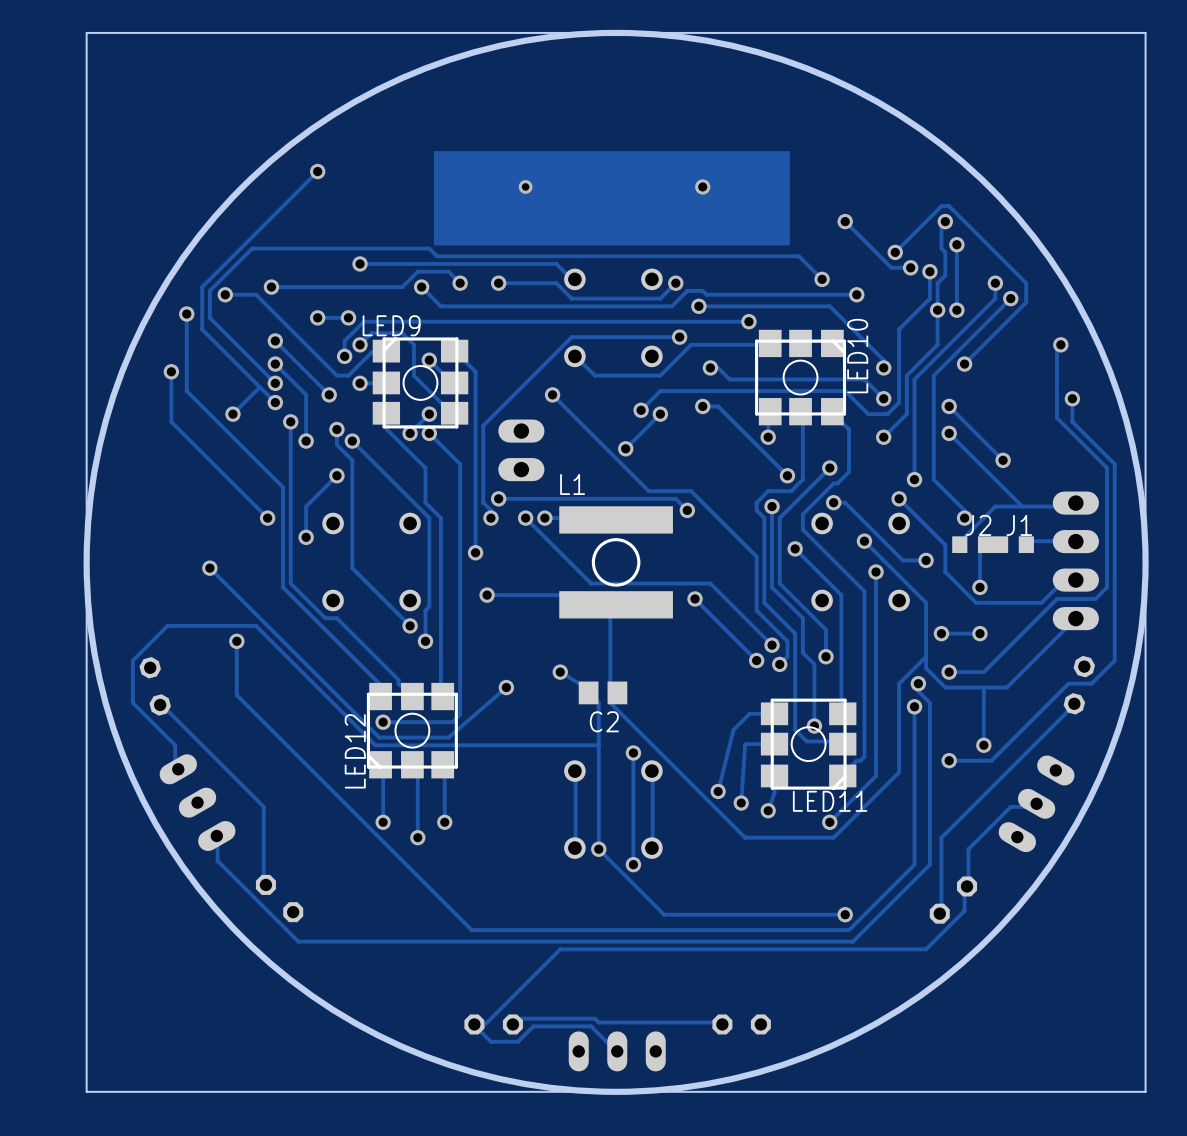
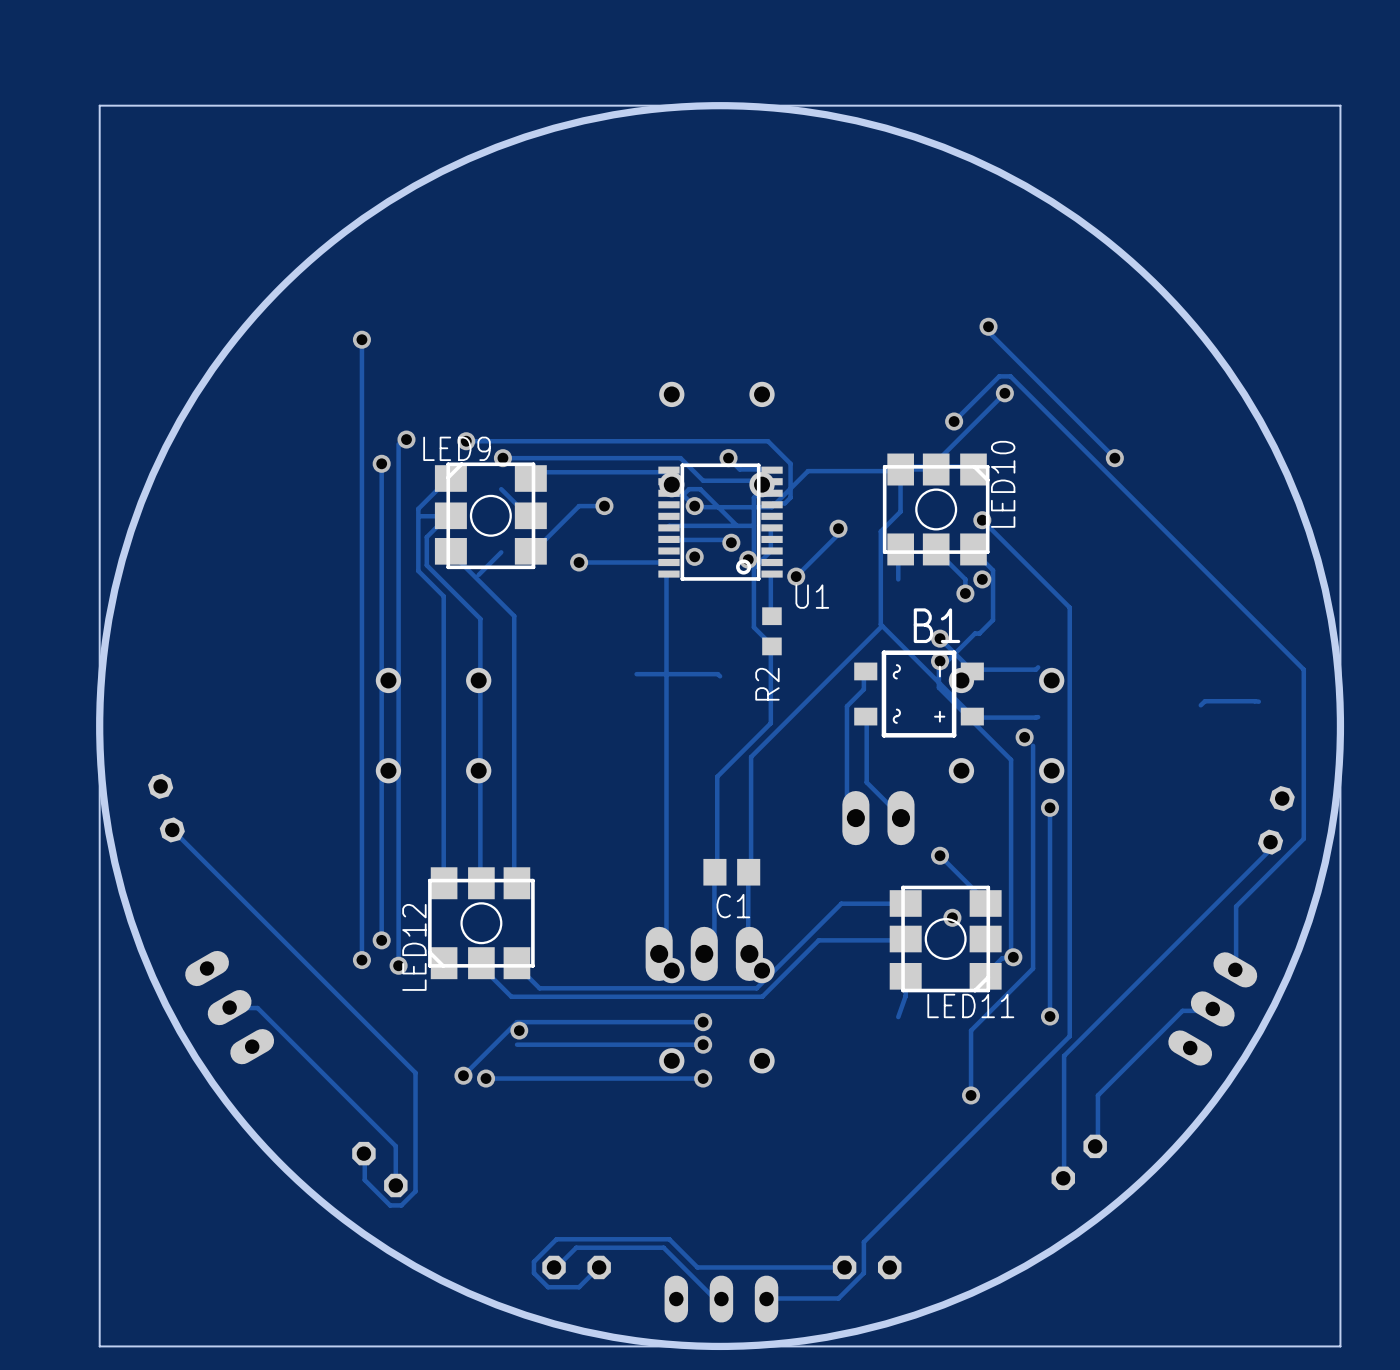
drawing: [433, 151, 790, 246] -> none
track: (317, 171) (202, 287) (202, 329) (275, 402) -> none
via: (317, 171) -> none
via: (525, 186) -> none
via: (702, 186) -> none
track: (845, 221) (891, 267) (910, 267) -> none
track: (945, 221) (941, 225) (941, 248) (945, 252) (945, 275) (937, 283) (937, 344) (906, 375) (906, 414) (883, 437) -> none
via: (945, 221) -> none
track: none -> (987, 331) (1114, 458)
track: none -> (361, 339) (361, 960)
via: none -> (361, 339)
track: (956, 244) (956, 310) -> none
via: (956, 244) -> none
track: (895, 252) (941, 206) (949, 206) (1026, 283) (1026, 302) (964, 364) -> none
via: (895, 252) -> none
track: (360, 263) (556, 263) (571, 279) (574, 279) -> none
via: (360, 263) -> none
via: (910, 267) -> none
track: (929, 271) (929, 298) (899, 329) (899, 402) (887, 414) (868, 414) (845, 391) (660, 391) (641, 410) -> none
via: (929, 271) -> none
track: none -> (1004, 393) (928, 469) (936, 469) (900, 469) (900, 511) (880, 531) (880, 624) (973, 717) (1038, 717)
track: (822, 279) (799, 256) (437, 256) (429, 248) (252, 248) (209, 290) (209, 317) (275, 383) -> none
via: (822, 279) -> none
track: (460, 283) (448, 271) (417, 271) (402, 287) (271, 287) -> none
via: (460, 283) -> none
via: (498, 283) -> none
track: (675, 283) (660, 298) (571, 298) (556, 283) (498, 283) -> none
via: (675, 283) -> none
track: (995, 283) (995, 298) (914, 379) (914, 461) -> (982, 520) (1069, 607)
via: (995, 283) -> none
via: (271, 287) -> none
track: (421, 287) (440, 306) (671, 306) (687, 290) (702, 290) (706, 294) (856, 294) -> none
via: (421, 287) -> none
track: (225, 294) (256, 294) (336, 375) (348, 375) (371, 352) (386, 351) -> none
via: (225, 294) -> none
via position: (856, 294) -> (1004, 393)
track: (1010, 298) (933, 375) (933, 479) (964, 510) (964, 518) -> none
via: (1010, 298) -> none
track: none -> (954, 421) (999, 376) (1010, 376) (1303, 669) (1303, 838) (1236, 906) (1235, 969)
via: none -> (954, 421)
track: (698, 306) (829, 306) (883, 360) (883, 367) -> none
via: (698, 306) -> none
via: (937, 310) -> none
via: (956, 310) -> none
track: (186, 314) (186, 391) (283, 487) (283, 587) (379, 683) (380, 696) -> (450, 478) (418, 508) (418, 570) (443, 596) (444, 883)
via: (186, 314) -> none
via: (317, 317) -> none
track: (348, 317) (317, 317) -> none
track: none -> (466, 441) (768, 441) (790, 463) (790, 497) (784, 503) (772, 504)
via: none -> (466, 441)
track: none -> (398, 444) (398, 965)
track: (748, 321) (363, 321) (344, 340) (344, 356) -> none
via: (748, 321) -> none
track: none -> (502, 458) (680, 458) (703, 480) (772, 481)
via: none -> (502, 458)
track: none -> (728, 458) (739, 469) (772, 470)
via: none -> (728, 458)
via: none -> (1114, 458)
track: (679, 337) (571, 337) (483, 425) (483, 502) (490, 510) (490, 518) -> none
via: (679, 337) -> none
track: none -> (381, 463) (381, 940)
via: none -> (381, 463)
track: (275, 340) (329, 394) -> none
via: (275, 340) -> none
track: (360, 344) (371, 333) (402, 333) (413, 344) (413, 375) (452, 414) (454, 413) -> (604, 506) (579, 506) (531, 554) (530, 551)
via: (360, 344) -> none
track: (1060, 344) (1056, 348) (1056, 417) (1107, 468) (1107, 587) (1095, 598) (1056, 598) (983, 672) (949, 672) -> none
via: (1060, 344) -> none
track: (454, 351) (475, 371) (475, 552) -> (530, 478) (536, 472) (666, 472) (669, 470)
via: (344, 356) -> none
via: (429, 360) -> none
track: none -> (666, 492) (669, 494) (683, 494) (689, 489) (700, 489) (736, 525)
track: none -> (770, 492) (770, 494) (756, 494) (753, 497) (755, 566)
track: (275, 364) (306, 394) (306, 441) -> none
via: (275, 364) -> none
via: (964, 364) -> none
track: (710, 367) (718, 367) (729, 379) (864, 379) (883, 398) -> none
via: (710, 367) -> none
via: (883, 367) -> none
track: (171, 371) (171, 421) (267, 518) -> none
via: (171, 371) -> none
via: none -> (604, 506)
via: none -> (694, 506)
via: (275, 383) -> none
via: (360, 383) -> none
via: none -> (982, 520)
track: (259, 387) (232, 414) -> none
U1: none -> (720, 522)
track: none -> (753, 525) (669, 525) (669, 527)
track: none -> (772, 527) (772, 550) (753, 568) (753, 627) (771, 646) (770, 723) (717, 776) (717, 869) (714, 872) (714, 943) (704, 953)
track: none -> (838, 528) (838, 534) (796, 576)
via: none -> (838, 528)
via: (329, 394) -> none
track: (552, 394) (648, 491) (691, 491) (756, 556) (756, 610) (787, 641) (787, 656) (779, 664) -> none
via: (552, 394) -> none
via: (883, 398) -> none
track: (1072, 398) (1072, 421) (1114, 464) (1114, 660) (1091, 683) (1068, 683) (991, 760) (949, 760) -> none
via: (1072, 398) -> none
via: (275, 402) -> none
track: none -> (669, 539) (728, 539) (731, 542)
via: none -> (731, 542)
track: (702, 406) (718, 406) (787, 475) -> none
via: (702, 406) -> none
track: (949, 406) (1003, 460) -> none
via: (949, 406) -> none
via: (641, 410) -> none
track: (800, 411) (802, 414) (802, 479) (791, 491) (768, 491) (756, 502) (756, 510) (764, 518) (764, 602) (795, 633) (795, 729) (806, 741) (841, 741) (842, 744) -> (936, 549) (965, 579) (965, 593)
track: (386, 413) (386, 429) (425, 468) (425, 502) (440, 518) (440, 695) (442, 696) -> (450, 551) (514, 616) (514, 881) (516, 883)
via: (232, 414) -> none
via: (429, 414) -> none
track: (660, 414) (625, 448) -> none
via: (660, 414) -> none
via: none -> (694, 556)
via: none -> (748, 559)
track: (290, 421) (290, 583) (325, 618) (336, 618) (398, 679) (398, 683) (412, 696) -> (450, 515) (449, 514) (426, 537) (426, 565) (480, 618) (481, 883)
via: (290, 421) -> none
via: none -> (579, 562)
track: none -> (669, 562) (579, 562)
track: (336, 429) (336, 444) (352, 460) (352, 568) (410, 625) -> none
via: (336, 429) -> none
track: none -> (669, 574) (666, 576) (666, 946) (659, 953)
track: none -> (772, 574) (771, 616)
via: (410, 433) -> none
track: (429, 433) (460, 464) (460, 714) (452, 722) (383, 722) -> none
via: (429, 433) -> none
track: (949, 433) (1022, 506) -> none
via: (949, 433) -> none
via: none -> (796, 576)
via: (768, 437) -> none
via: none -> (982, 579)
via: (883, 437) -> none
via: (306, 441) -> none
track: (352, 441) (429, 518) (429, 606) (425, 610) (425, 641) -> none
via: (352, 441) -> none
via: (625, 448) -> none
via: none -> (965, 593)
part rotation: 0° (521, 450) -> 90° clockwise (878, 818)
part position: (521, 450) -> (878, 818)
via: (1003, 460) -> none
track: (829, 468) (779, 518) (779, 583) (825, 629) (825, 656) -> none
via: (829, 468) -> none
track: (336, 475) (306, 506) (306, 537) -> none
via: (336, 475) -> none
via: (787, 475) -> none
track: none -> (882, 625) (751, 757) (751, 869) (748, 872) (749, 953)
track: none -> (1069, 629) (1069, 895)
via: (914, 479) -> none
R2: none -> (771, 631)
track: none -> (940, 638) (972, 671) (973, 669) (1035, 669) (1038, 667)
via: none -> (940, 638)
track: (498, 498) (675, 498) (687, 510) -> none
via: (498, 498) -> none
track: (899, 498) (945, 545) (945, 572) (976, 602) (1041, 602) (1060, 583) (1072, 583) (1075, 580) -> none
via: (899, 498) -> none
track: (833, 502) (845, 502) (902, 560) (926, 560) -> none
via: (833, 502) -> none
track: (1075, 503) (1072, 506) (995, 506) (960, 541) (959, 544) -> none
track: (772, 506) (772, 587) (802, 618) (802, 652) (814, 664) (814, 726) -> none
via: (772, 506) -> none
via: none -> (940, 661)
via: (687, 510) -> none
track: none -> (865, 671) (863, 672) (863, 689) (846, 706) (846, 807) (855, 818)
via: (267, 518) -> none
via: (490, 518) -> none
track: (525, 518) (591, 583) (710, 583) (772, 645) -> none
via: (525, 518) -> none
via: (544, 518) -> none
via: (964, 518) -> none
B1: none -> (919, 694)
via: (306, 537) -> none
track: (864, 541) (926, 602) (926, 668) (945, 687) (1006, 687) (1075, 618) -> none
via: (864, 541) -> none
J2: (972, 544) -> none
track: (1000, 544) (999, 541) (987, 541) (979, 548) (979, 587) -> none
J1: (1013, 544) -> none
track: (795, 548) (841, 595) (842, 713) -> (940, 855) (985, 903)
via: (795, 548) -> none
via: (475, 552) -> none
track: none -> (865, 716) (866, 782) (900, 818)
via: (926, 560) -> none
part: (1075, 560) -> none
L1: (616, 562) -> none
track: (209, 568) (379, 737) (448, 737) (506, 687) -> none
via: (209, 568) -> none
track: (876, 572) (876, 776) (829, 822) -> none
track: none -> (1033, 745) (1033, 968) (971, 1030) (971, 1095)
via: (979, 587) -> none
track: (487, 595) (606, 595) (616, 604) (610, 610) (610, 683) (617, 692) (610, 687) (610, 702) (745, 837) (833, 837) (899, 772) (899, 683) (926, 656) -> none
via: (487, 595) -> none
track: (695, 598) (756, 660) -> none
via: (695, 598) -> none
via: (410, 625) -> none
track: none -> (1050, 807) (1050, 1016)
via: none -> (1050, 807)
via: (941, 633) -> none
track: (979, 633) (941, 633) -> none
via: (979, 633) -> none
track: (236, 641) (236, 695) (471, 930) (849, 930) (914, 864) (914, 827) -> (766, 1299) (838, 1298) (863, 1273) (863, 1242) (1069, 1036)
via: (236, 641) -> none
via: (425, 641) -> none
via: (772, 645) -> none
track: none -> (172, 829) (415, 1072) (415, 1191) (401, 1205) (390, 1205) (364, 1180) (363, 1153)
via: (825, 656) -> none
via: (756, 660) -> none
track: none -> (1270, 842) (1269, 850) (1064, 1055) (1063, 1178)
via: (779, 664) -> none
track: (560, 672) (579, 683) (598, 702) (598, 849) (664, 914) (845, 914) -> none
via: (560, 672) -> none
via: (949, 672) -> none
via: none -> (940, 855)
track: (918, 683) (918, 691) (929, 702) (929, 864) (852, 941) (298, 941) (217, 860) (216, 836) -> none
via: (918, 683) -> none
part position: (1079, 685) -> (1276, 820)
part position: (155, 686) -> (166, 808)
via: (506, 687) -> none
C1: none -> (731, 872)
track: (983, 687) (983, 745) -> none
C2: (603, 692) -> none
track: (1074, 703) (941, 837) (941, 910) (939, 913) -> none
track: (160, 704) (263, 806) (263, 883) (265, 884) -> none
via: (914, 706) -> none
track: (774, 713) (749, 713) (733, 729) (718, 791) -> (905, 903) (841, 903) (756, 988) (539, 988) (517, 965) (516, 963)
via: (383, 722) -> none
track: (774, 744) (745, 745) (741, 803) -> (905, 939) (818, 940) (762, 996) (511, 996) (480, 965) (481, 963)
via: none -> (381, 940)
track: (598, 745) (375, 745) (256, 625) (167, 625) (132, 660) (132, 702) (175, 745) (175, 768) (178, 769) -> none
via: (983, 745) -> none
track: (633, 752) (633, 864) -> none
via: (633, 752) -> none
part: none -> (704, 953)
via: none -> (1013, 957)
via: (949, 760) -> none
via: none -> (361, 960)
track: (380, 764) (383, 767) (383, 822) -> none
track: (412, 764) (417, 770) (417, 837) -> none
track: (442, 764) (444, 766) (444, 822) -> none
via: none -> (398, 965)
track: (574, 771) (574, 848) -> none
track: (651, 771) (651, 848) -> none
via: (718, 791) -> none
track: none -> (229, 1007) (257, 1008) (395, 1146) (395, 1185)
via: (741, 803) -> none
track: (1036, 803) (1033, 806) (1010, 806) (968, 849) (968, 883) (964, 887) (964, 910) (926, 949) (560, 949) (479, 1030) (474, 1024) (475, 1026) (490, 1041) (517, 1041) (533, 1026) (591, 1026) (617, 1051) -> (1212, 1008) (1210, 1010) (1182, 1010) (1097, 1095) (1097, 1146) (1095, 1146)
via: (768, 810) -> none
via: none -> (1050, 1016)
track: none -> (703, 1022) (517, 1022) (463, 1075)
via: none -> (703, 1022)
via: (383, 822) -> none
via: (829, 822) -> none
track: none -> (703, 1044) (517, 1044)
via: none -> (703, 1044)
via: (417, 837) -> none
via: (598, 849) -> none
via: none -> (463, 1075)
via: none -> (486, 1078)
track: none -> (703, 1078) (486, 1078)
via: none -> (703, 1078)
via: (633, 864) -> none
via: none -> (971, 1095)
part position: (279, 898) -> (379, 1169)
part position: (953, 900) -> (1079, 1162)
via: (845, 914) -> none
track: none -> (554, 1267) (556, 1267) (576, 1247) (663, 1247) (714, 1298) (721, 1299)
track: (722, 1024) (721, 1022) (598, 1022) (594, 1018) (517, 1018) (512, 1024) -> (844, 1267) (697, 1267) (669, 1239) (556, 1239) (533, 1261) (533, 1273) (548, 1287) (579, 1287) (598, 1267)

